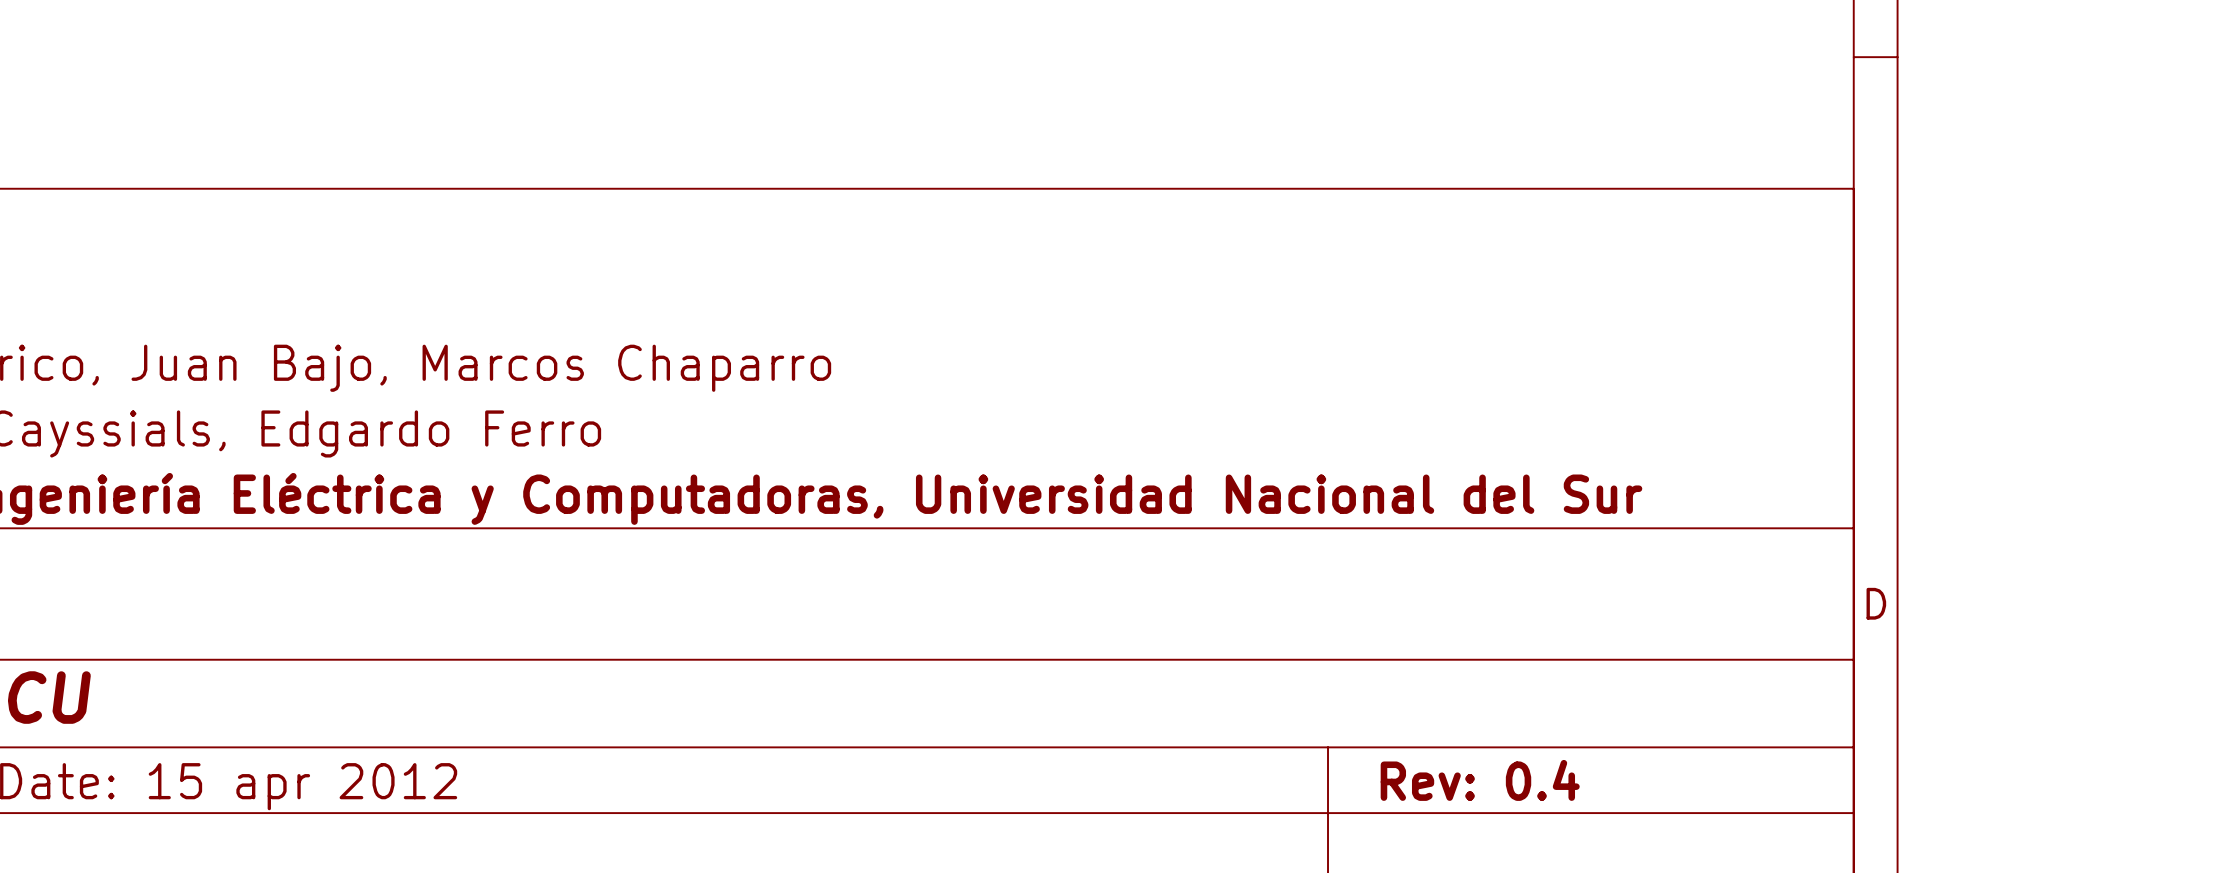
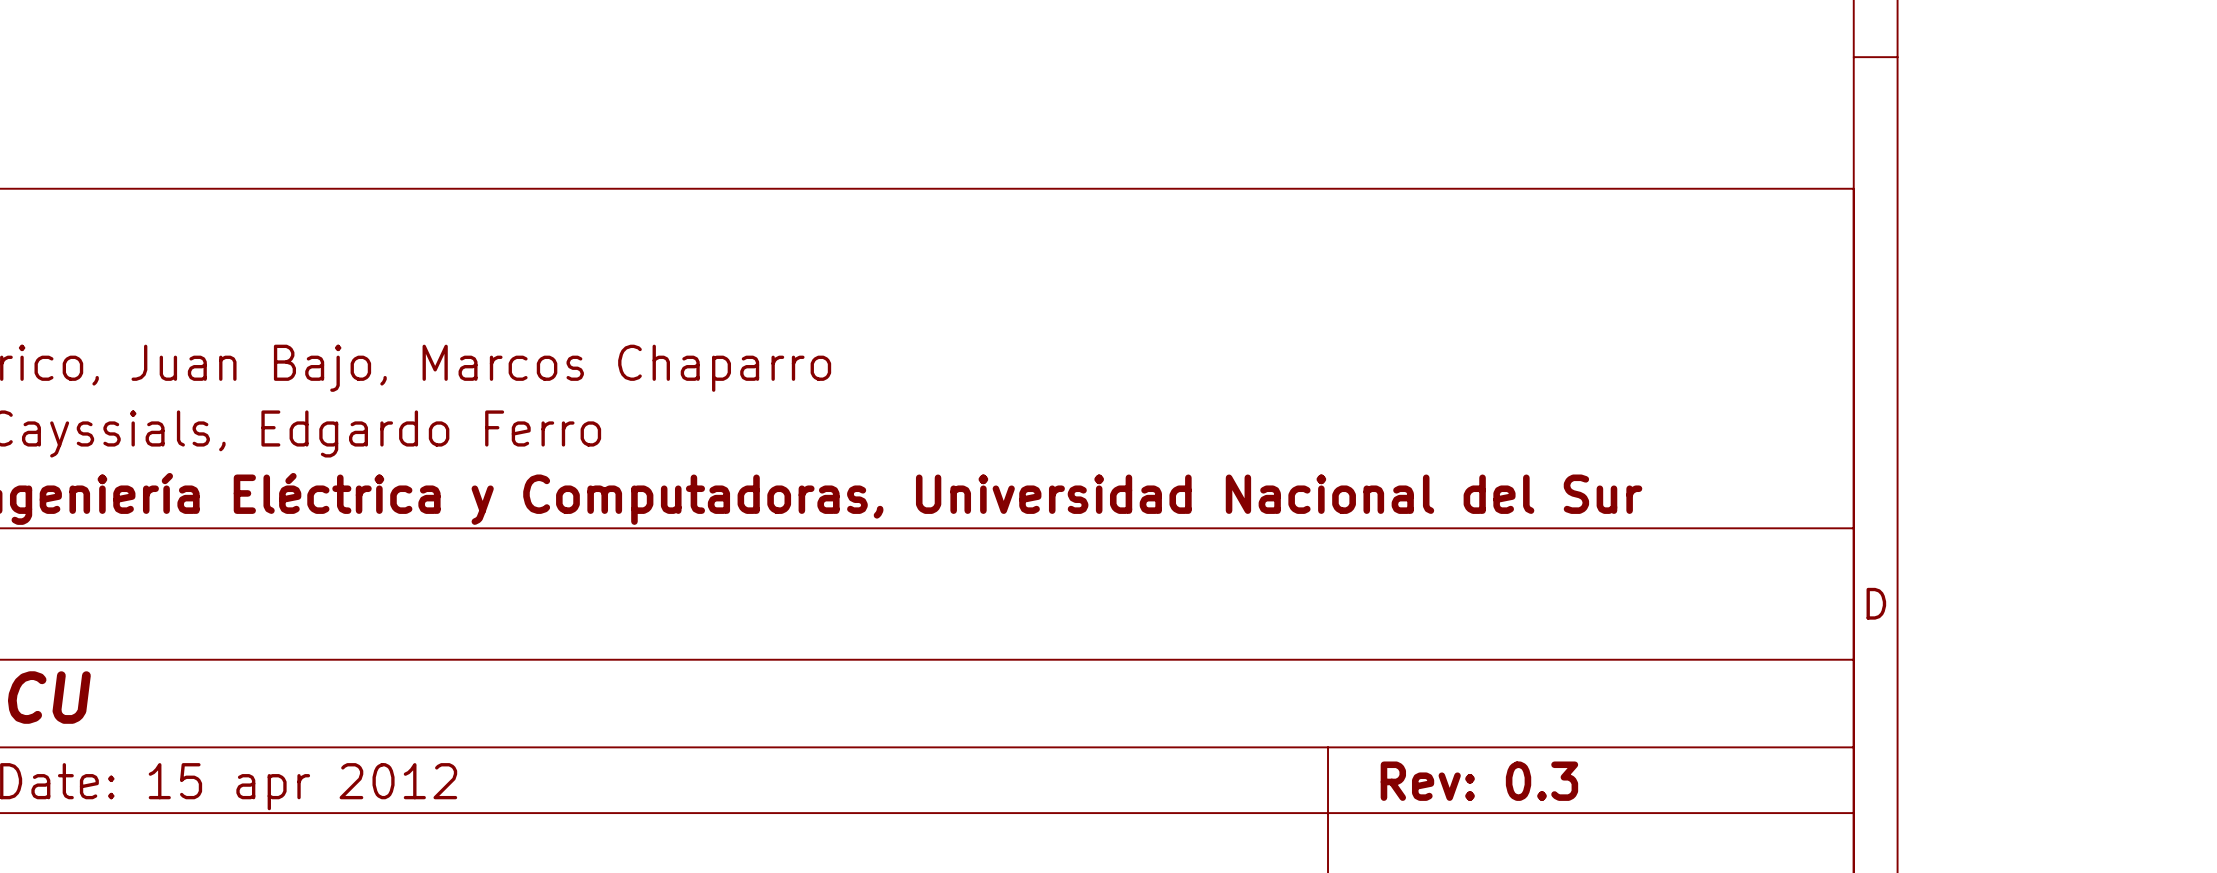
title block: Rev: 0.4 (1480, 780) -> Rev: 0.3 (1479, 781)

